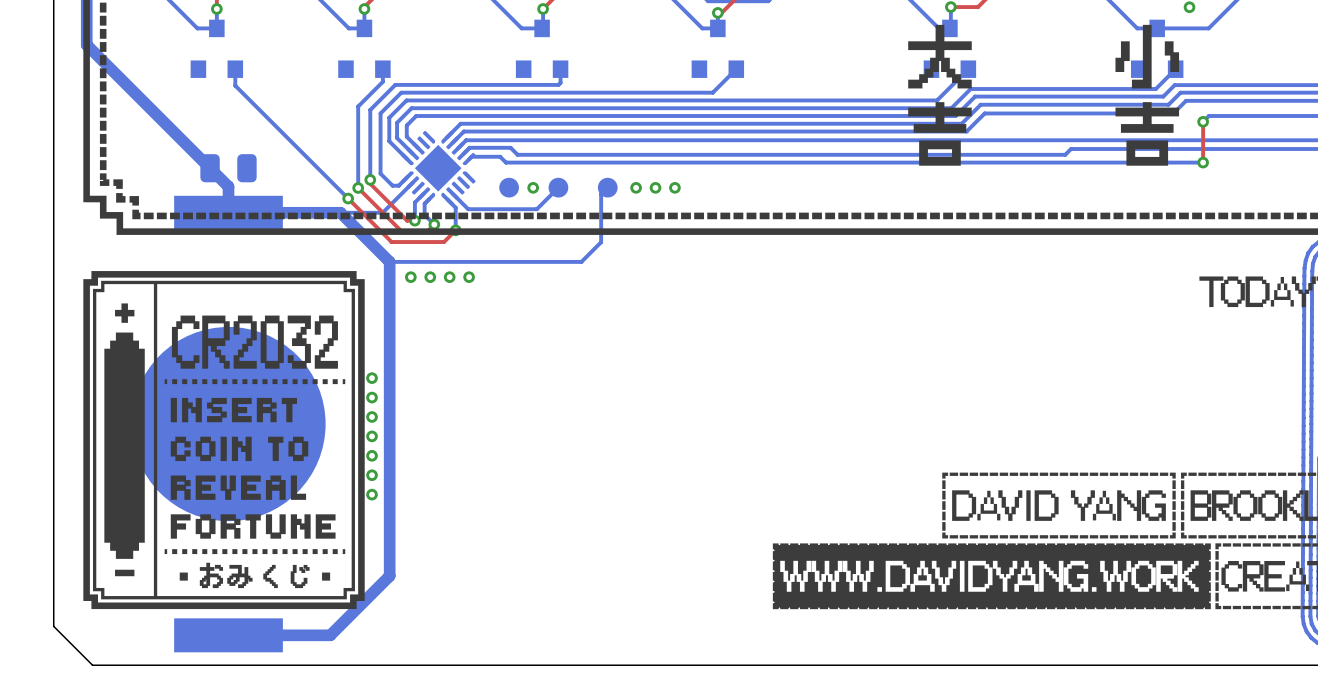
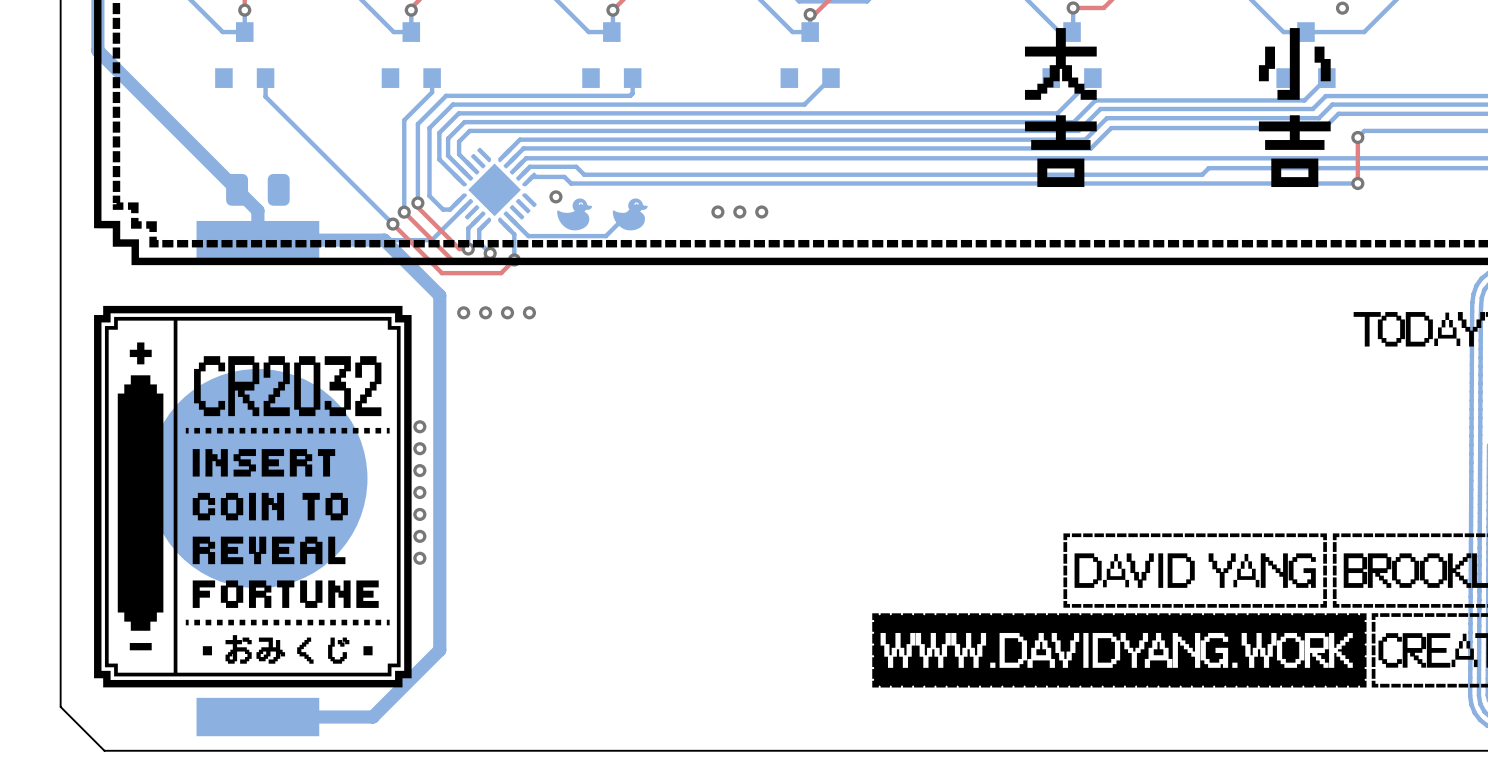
part footprint: [499, 177, 519, 198] -> [557, 198, 592, 231]
part footprint: [548, 177, 569, 198] -> [612, 198, 648, 231]
via position: (533, 187) -> (555, 196)
bottom track: (607, 187) (601, 194) (601, 242) (581, 261) (389, 261) -> none
part: (607, 187) -> none

